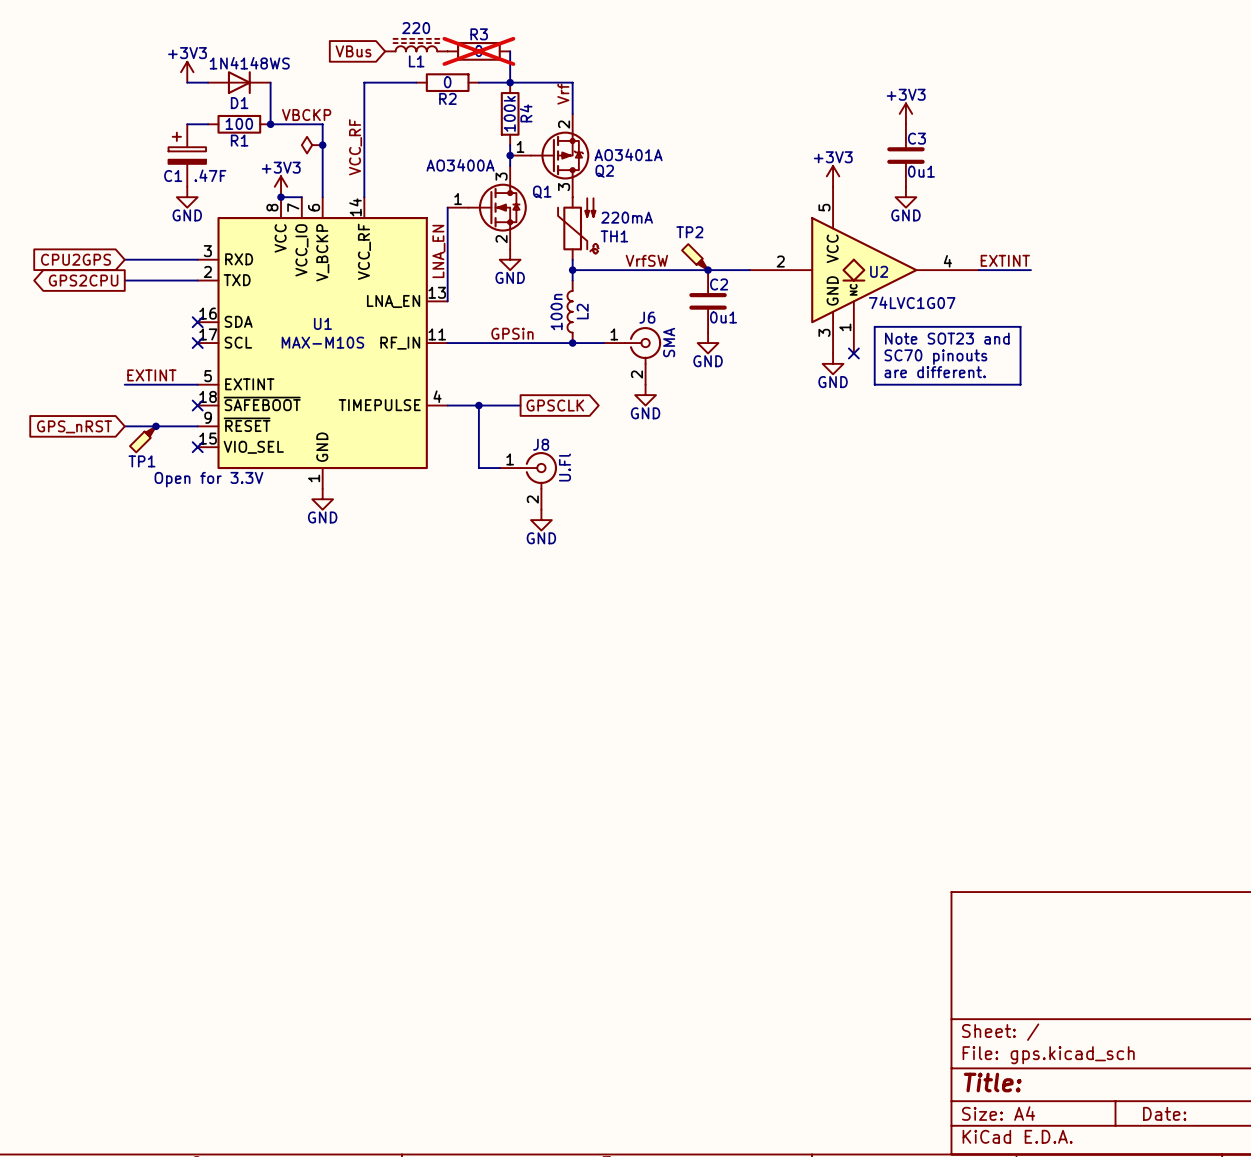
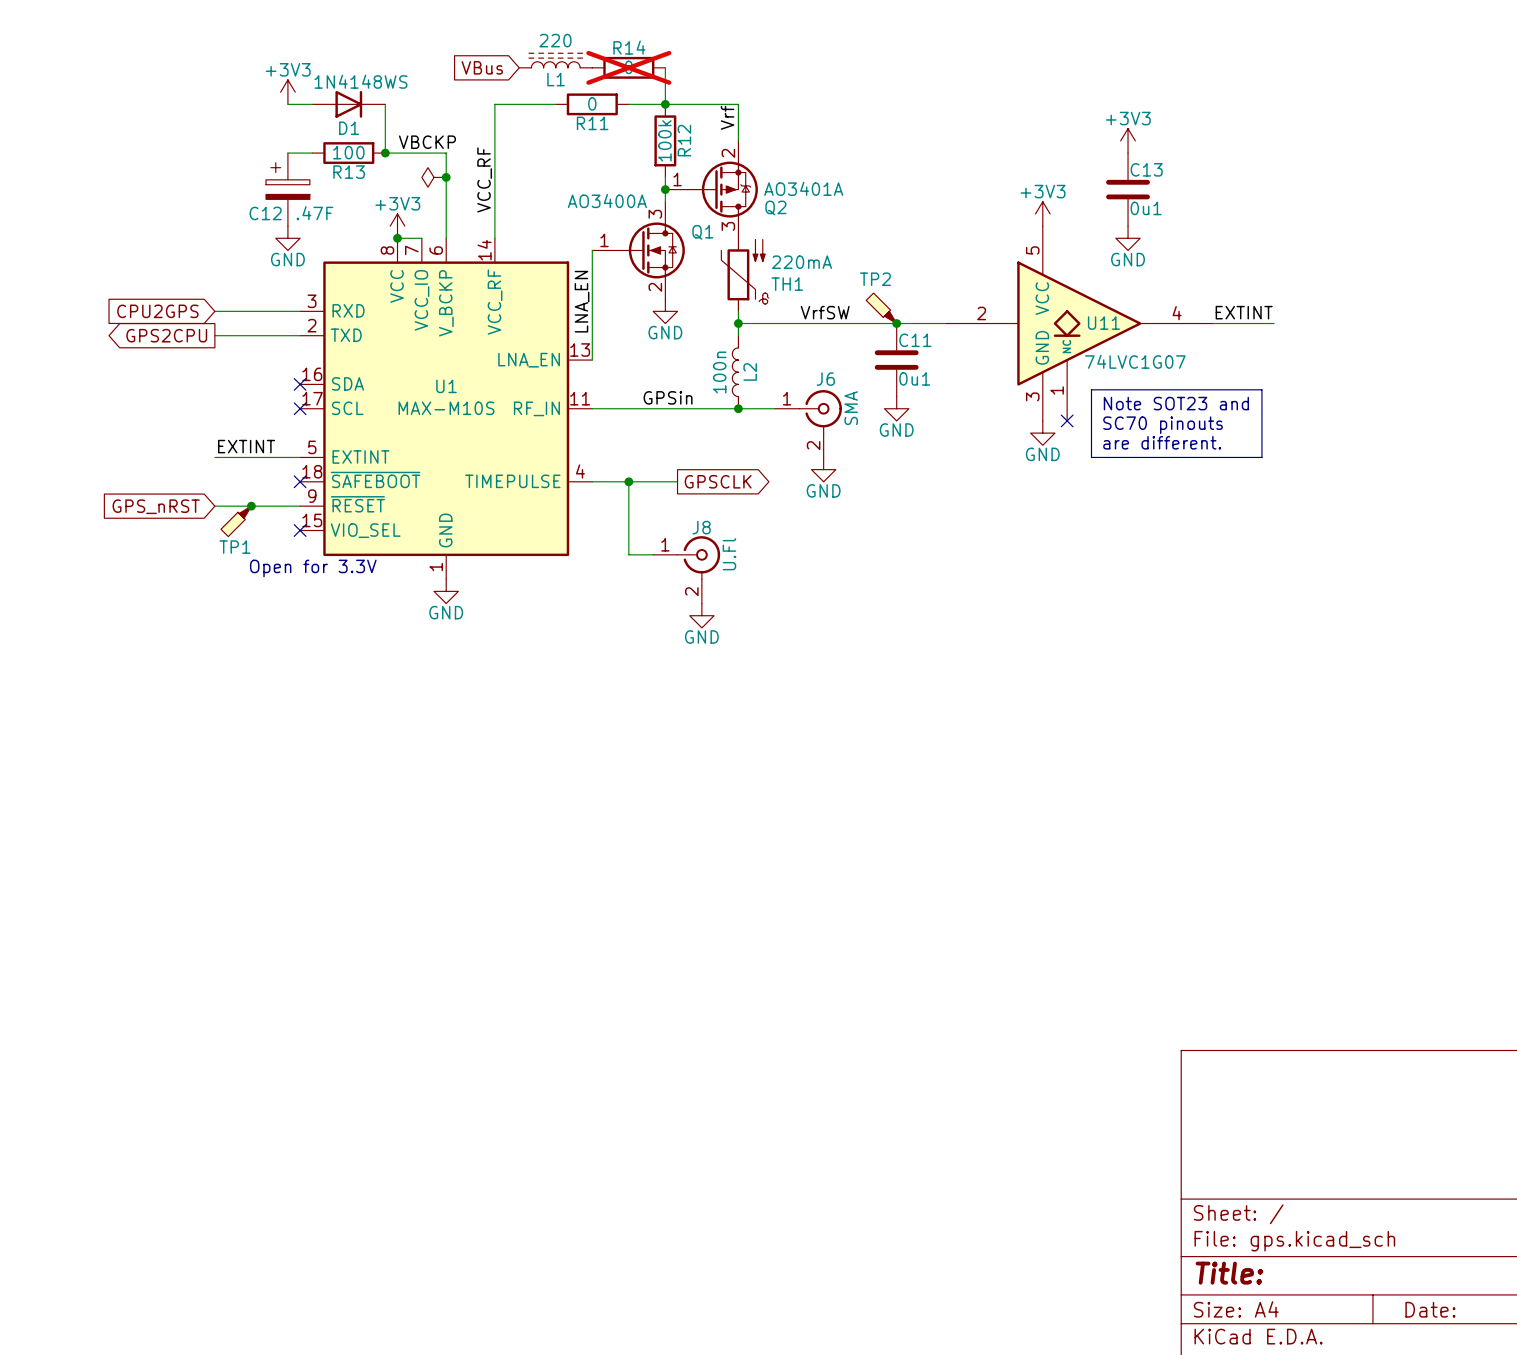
R3 name: R3 (479, 34) -> R14 (629, 47)
R2 name: R2 (447, 98) -> R11 (592, 123)
R4 name: R4 (526, 113) -> R12 (684, 140)
C3 name: C3 (916, 138) -> C13 (1146, 169)
R1 name: R1 (239, 140) -> R13 (349, 172)
C1 name: C1 (173, 175) -> C12 (265, 213)
U2 name: U2 (879, 271) -> U11 (1103, 323)
C2 name: C2 (719, 284) -> C11 (915, 340)

